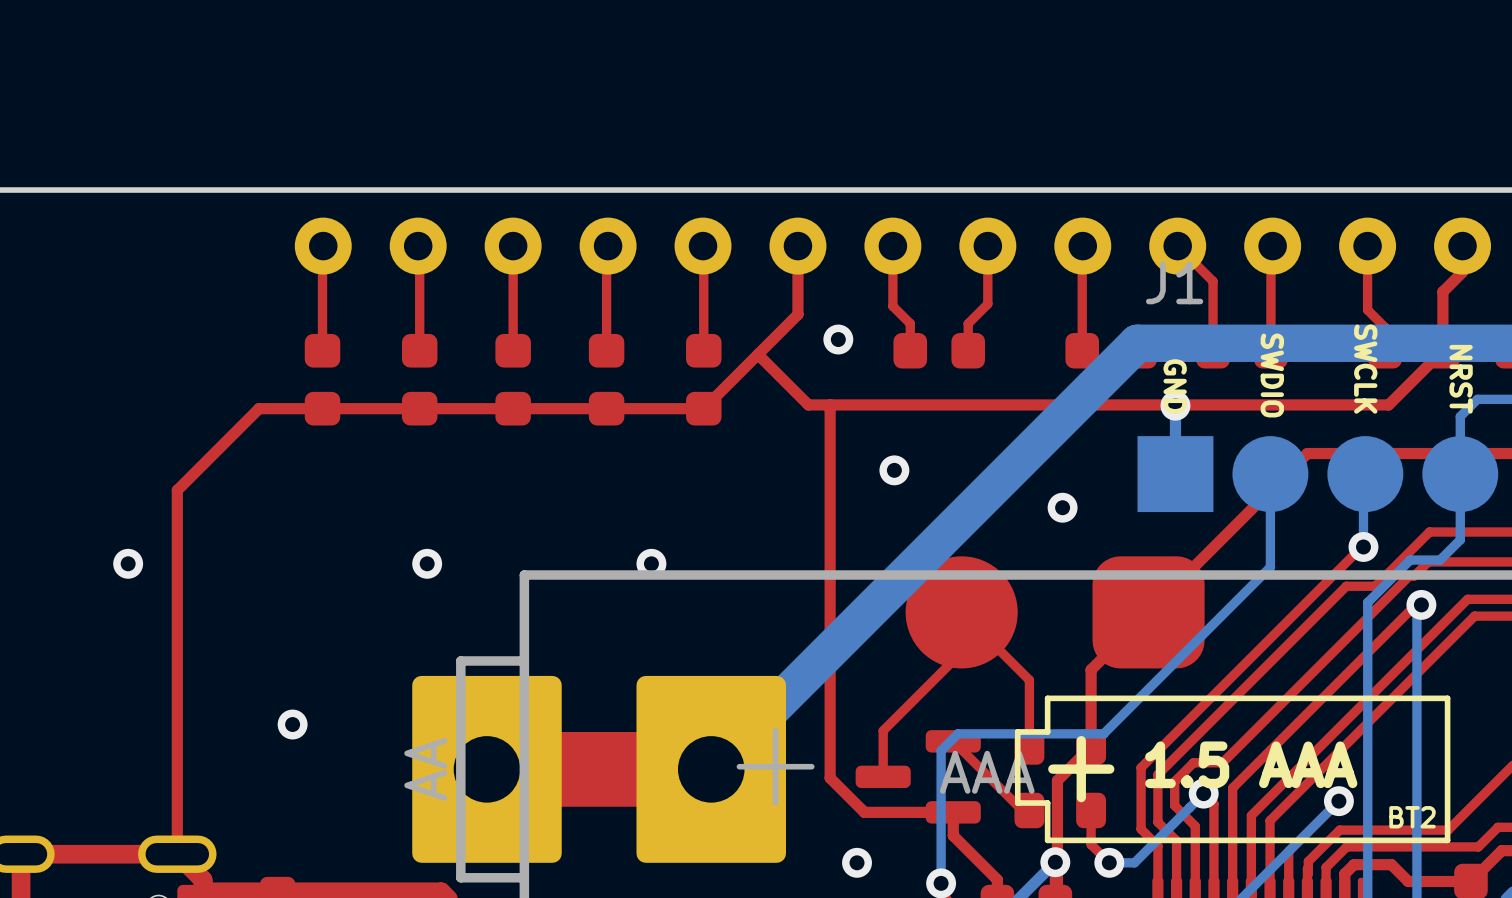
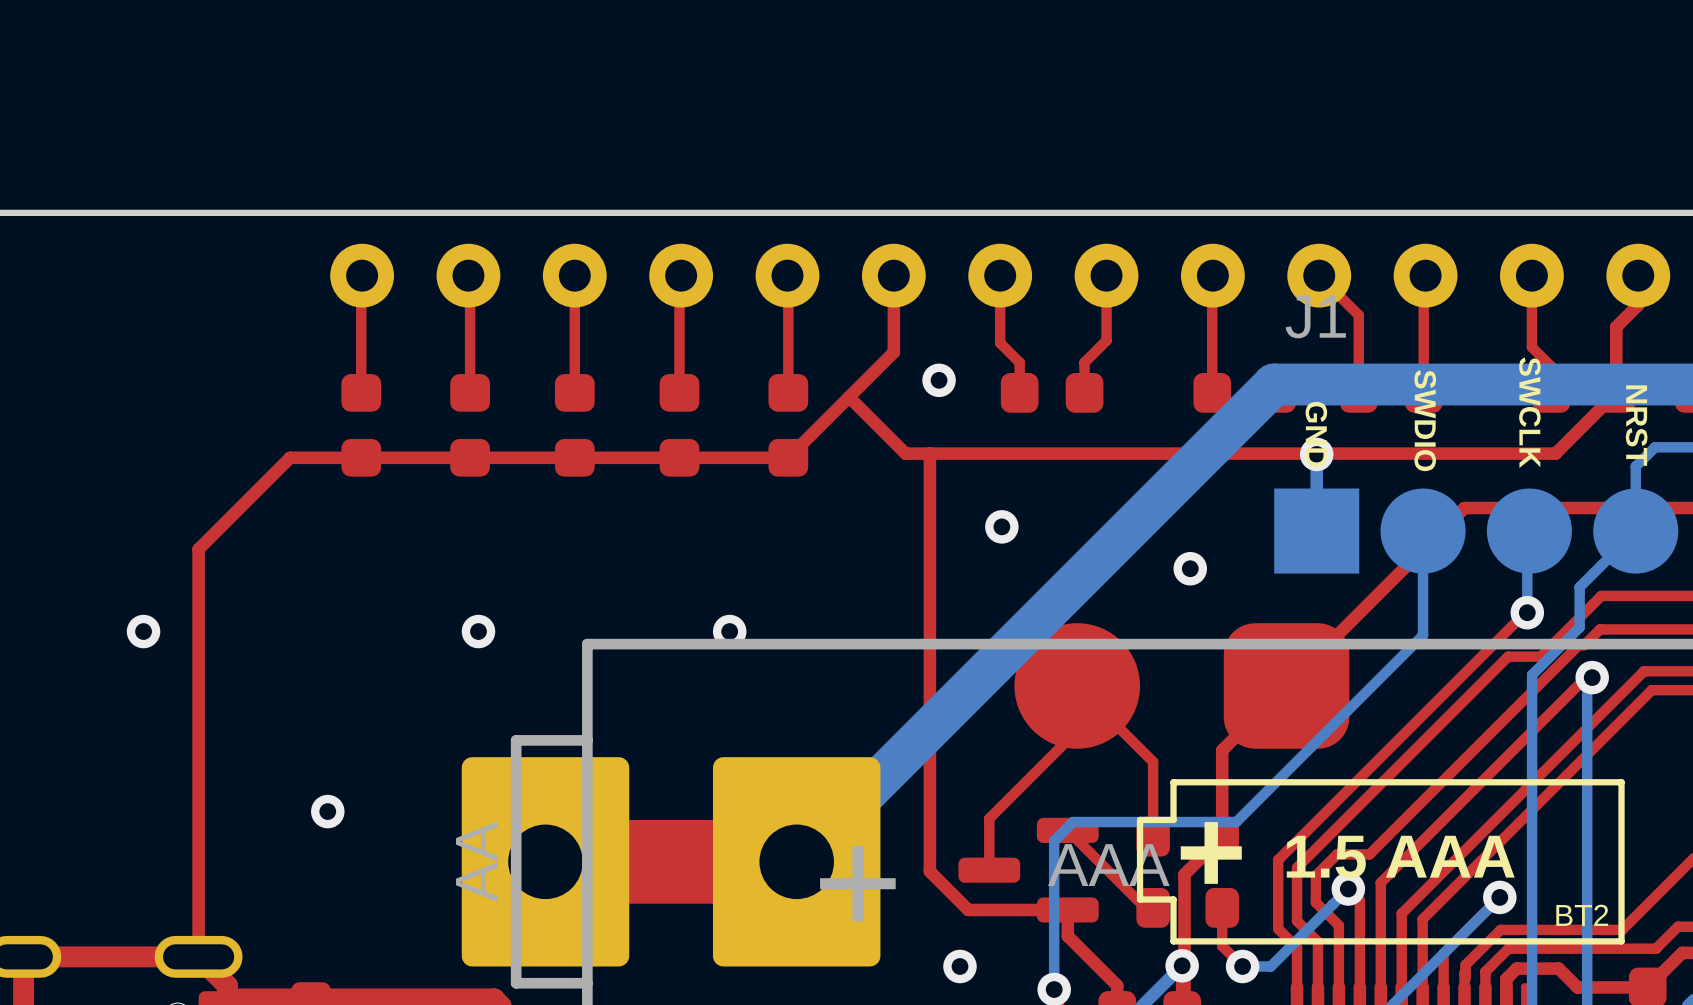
bottom track: (1460, 474) (1460, 539) (1440, 560) (1410, 560) -> (1635, 531) (1579, 587) (1579, 627)

